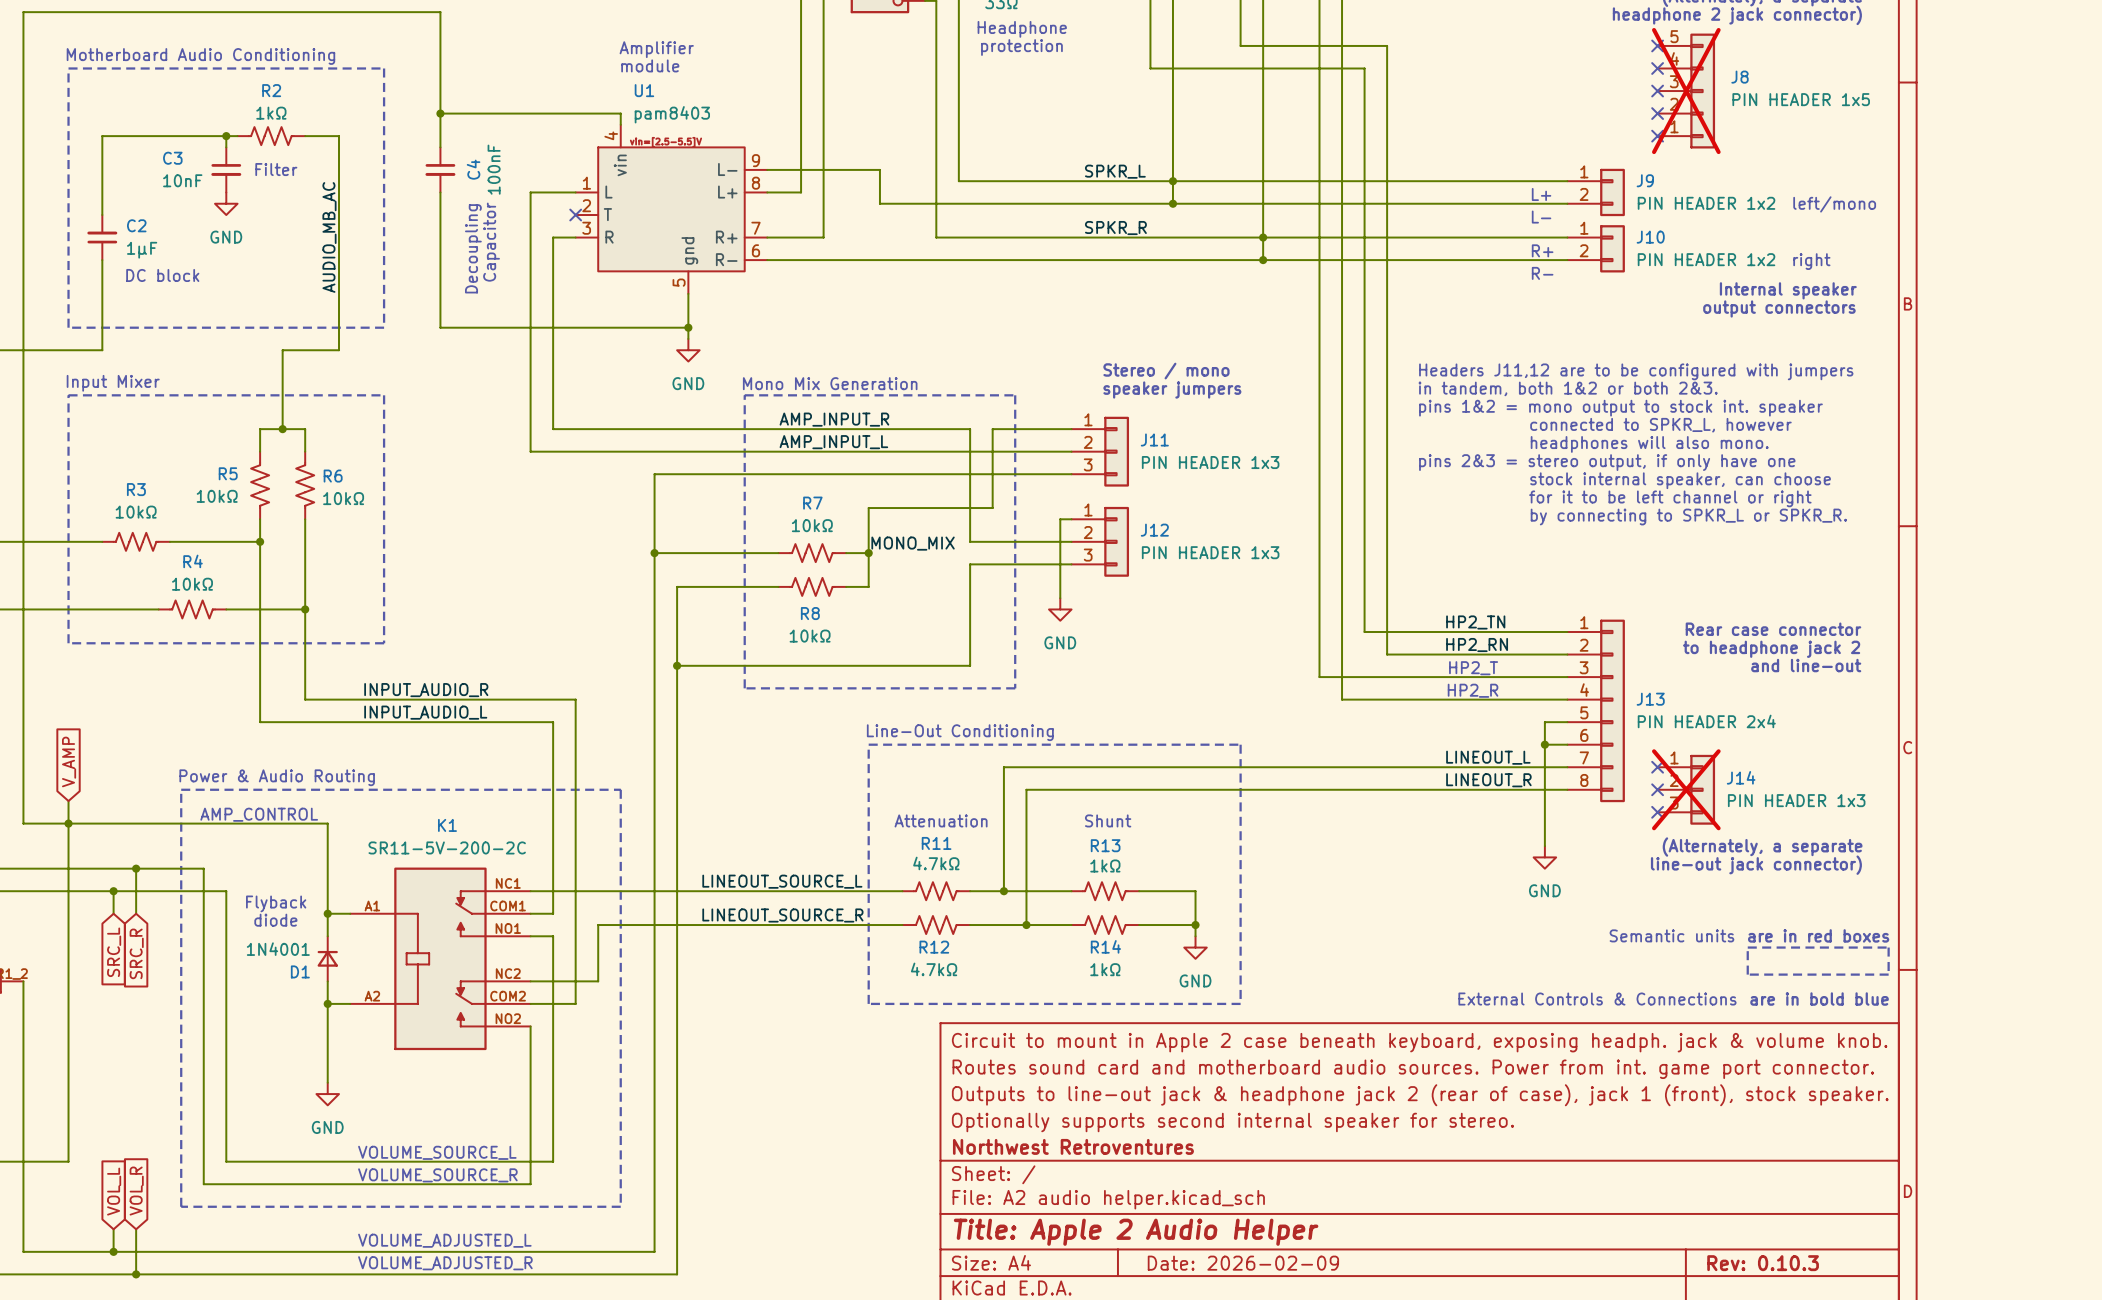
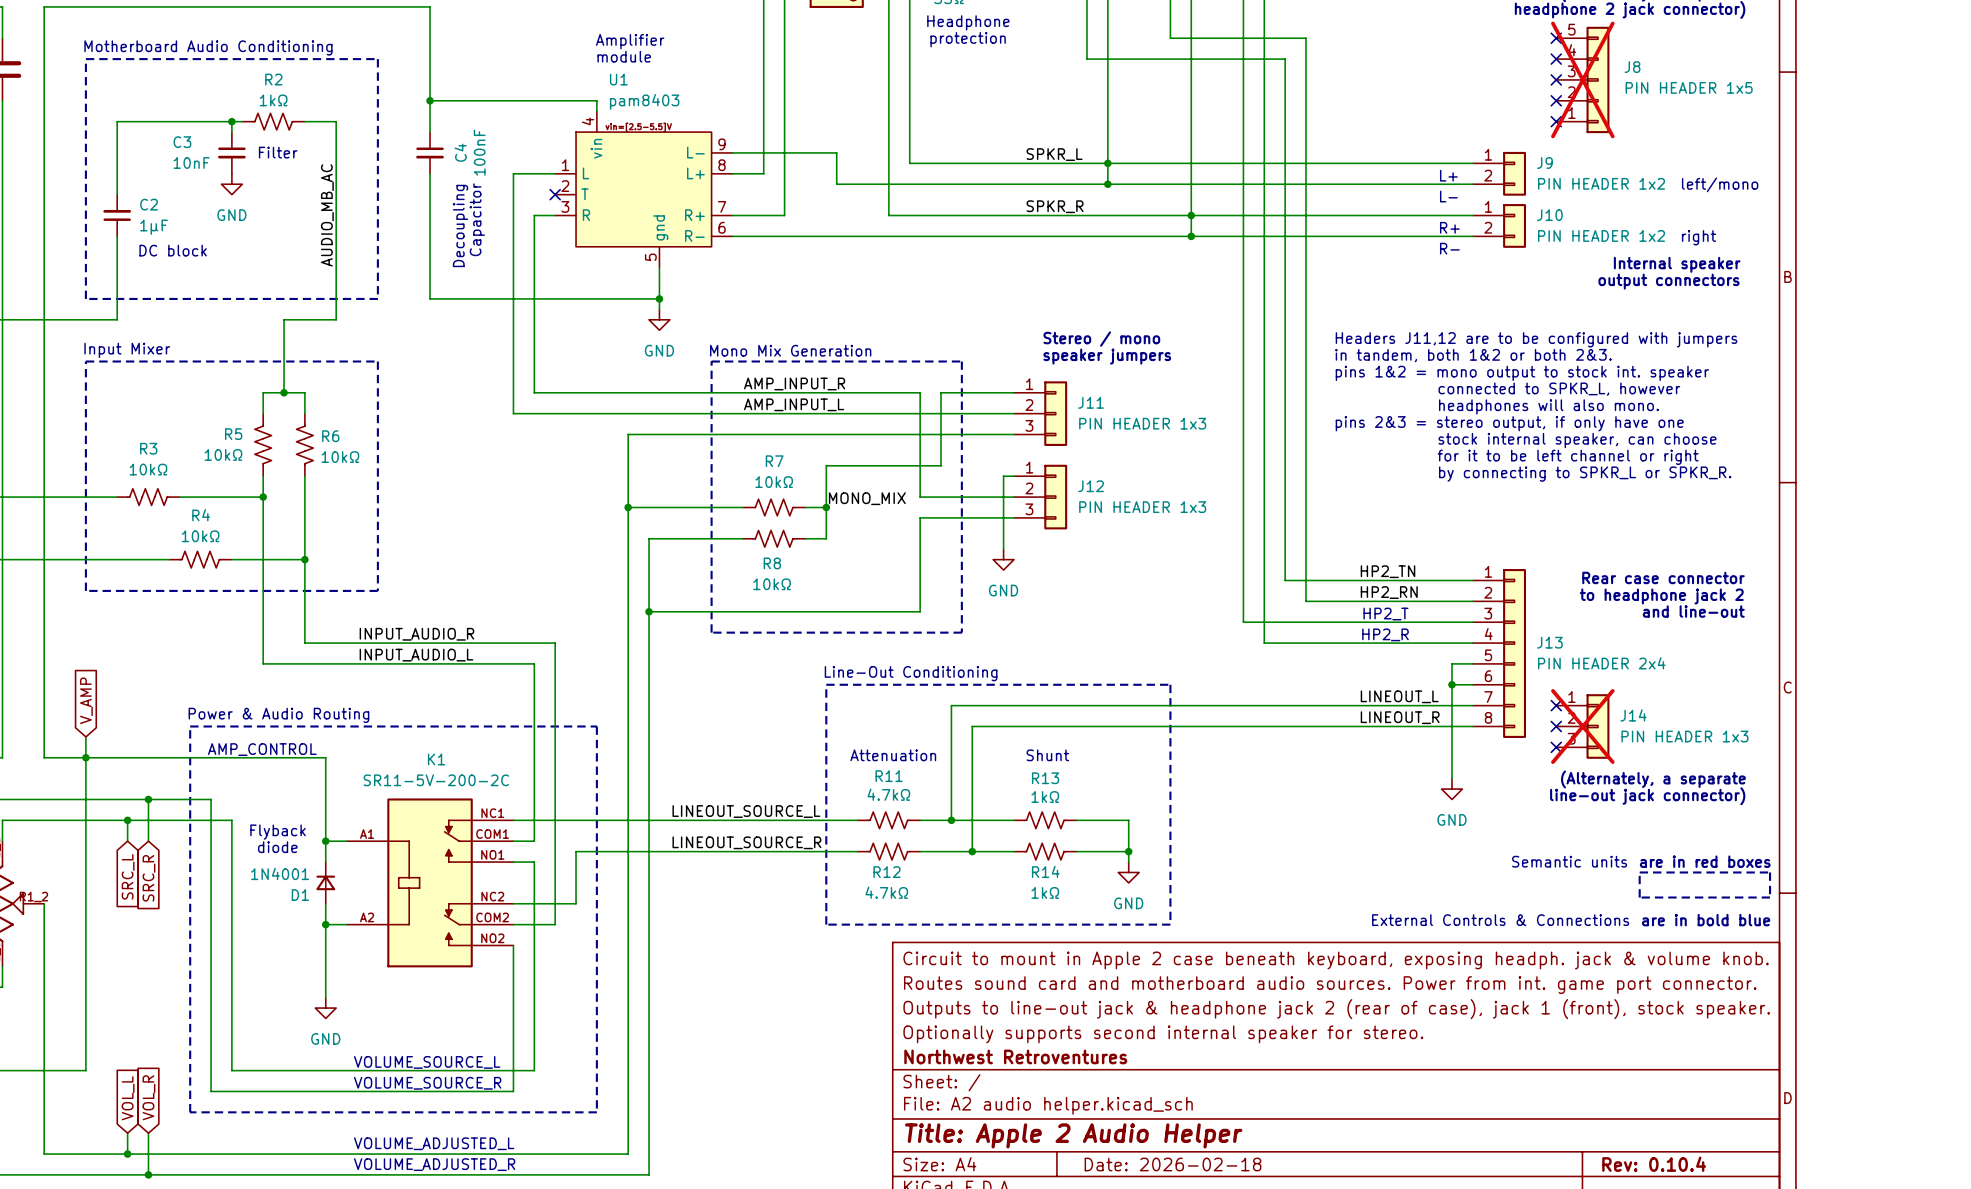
title block: Date: 2026-02-09 (1243, 1263) -> Date: 2026-02-18 (1173, 1164)
title block: Rev: 0.10.3 (1763, 1263) -> Rev: 0.10.4 (1654, 1164)

